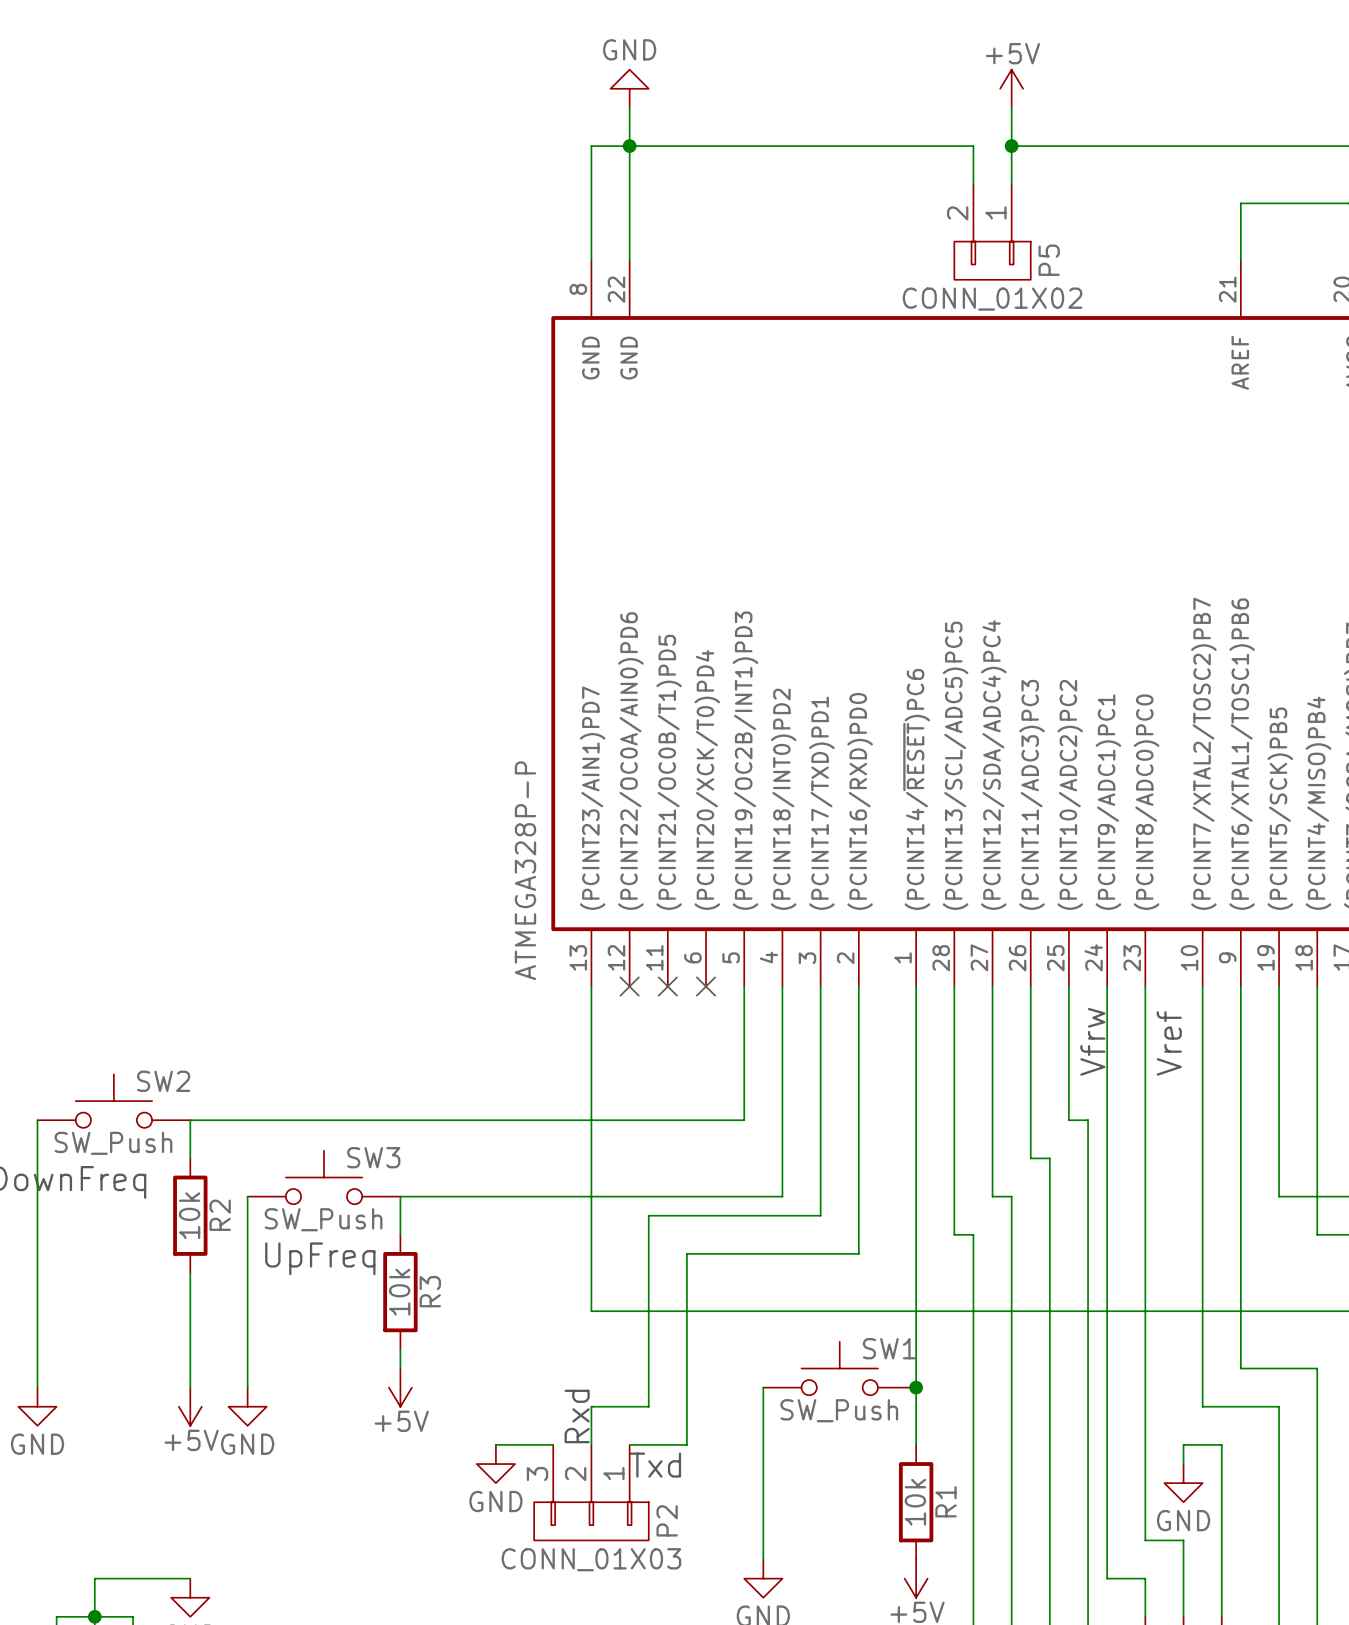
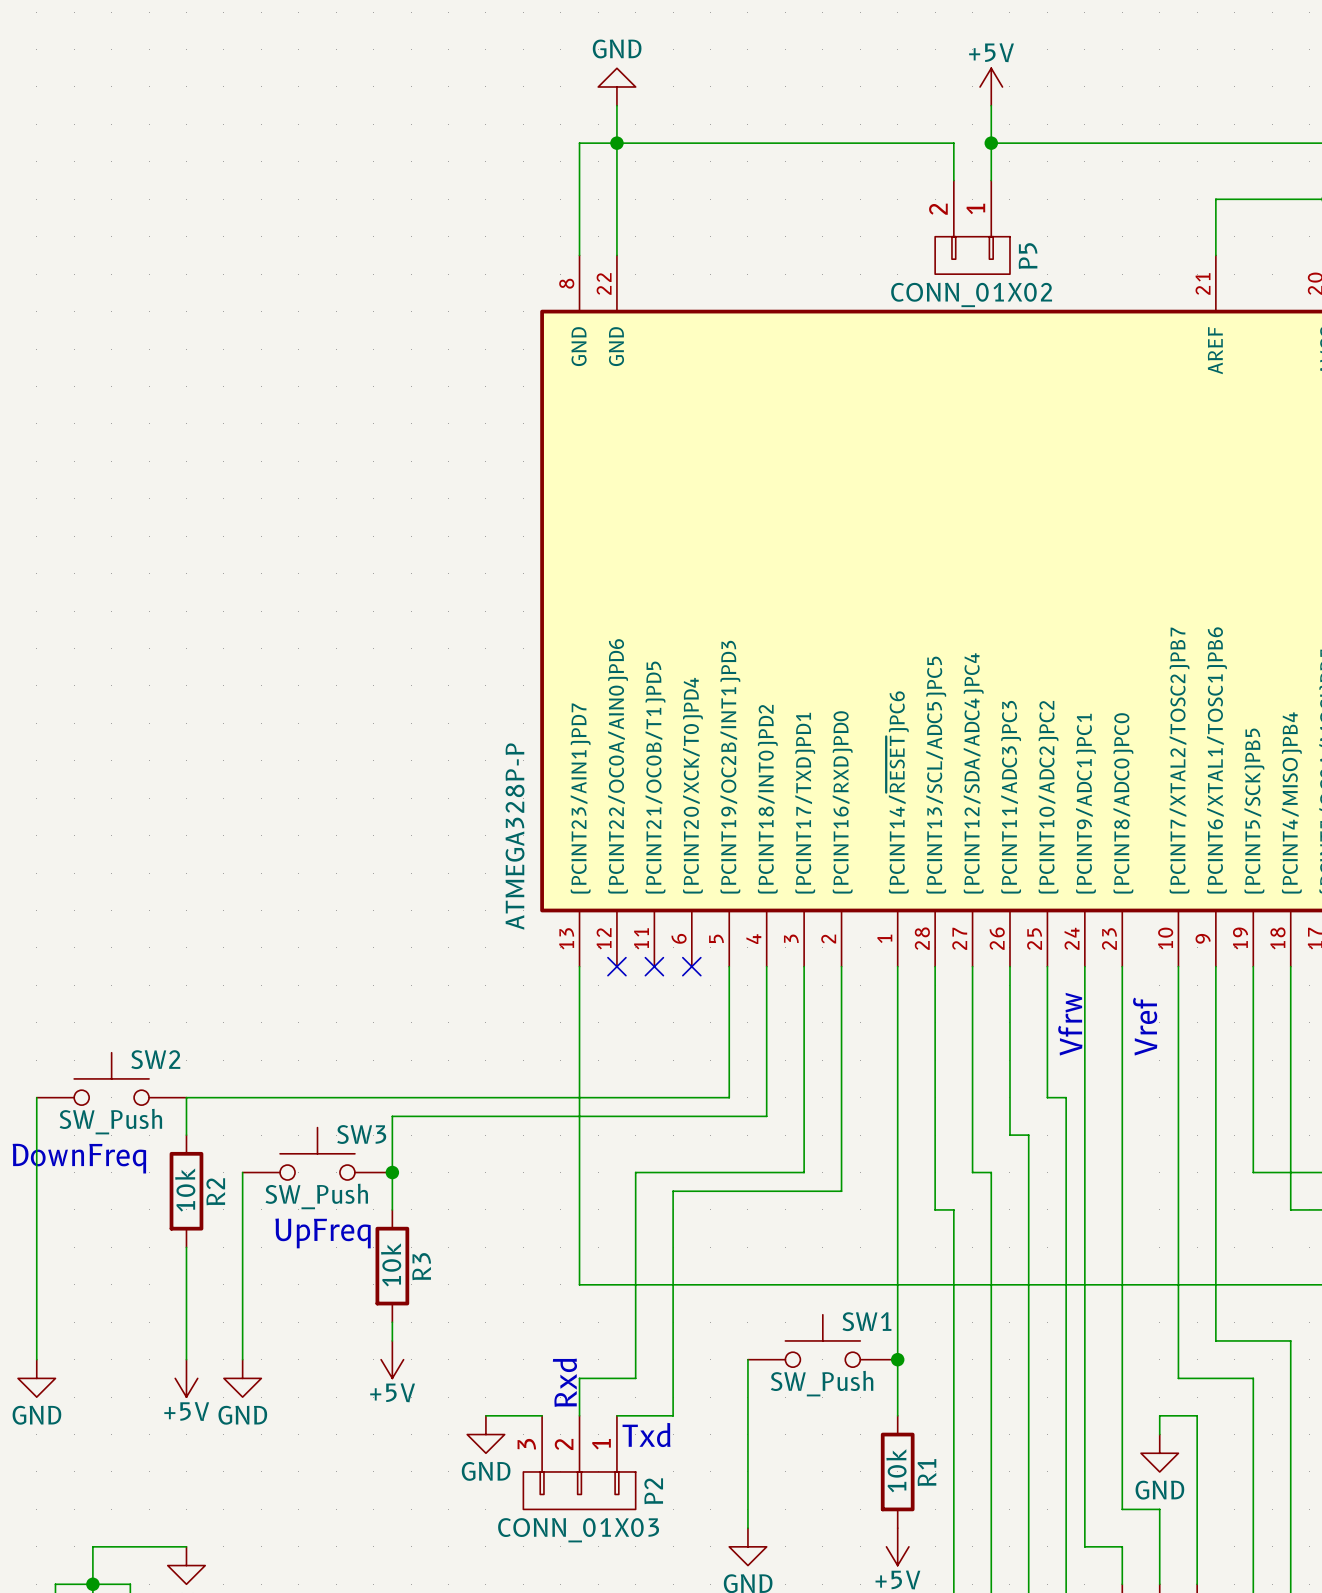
wire: (782, 1139) (782, 1196) -> (804, 1172) (766, 1172)
wire: (400, 1196) (648, 1196) -> (392, 1172) (392, 1116) (766, 1116)
junction: none -> (392, 1172)
wire: (820, 1196) (820, 1215) -> (841, 1191) (804, 1191)
wire: (648, 1215) (686, 1215) -> (635, 1191) (635, 1172)
wire: (858, 1215) (858, 1253) (686, 1253) -> (673, 1191) (673, 1228)

